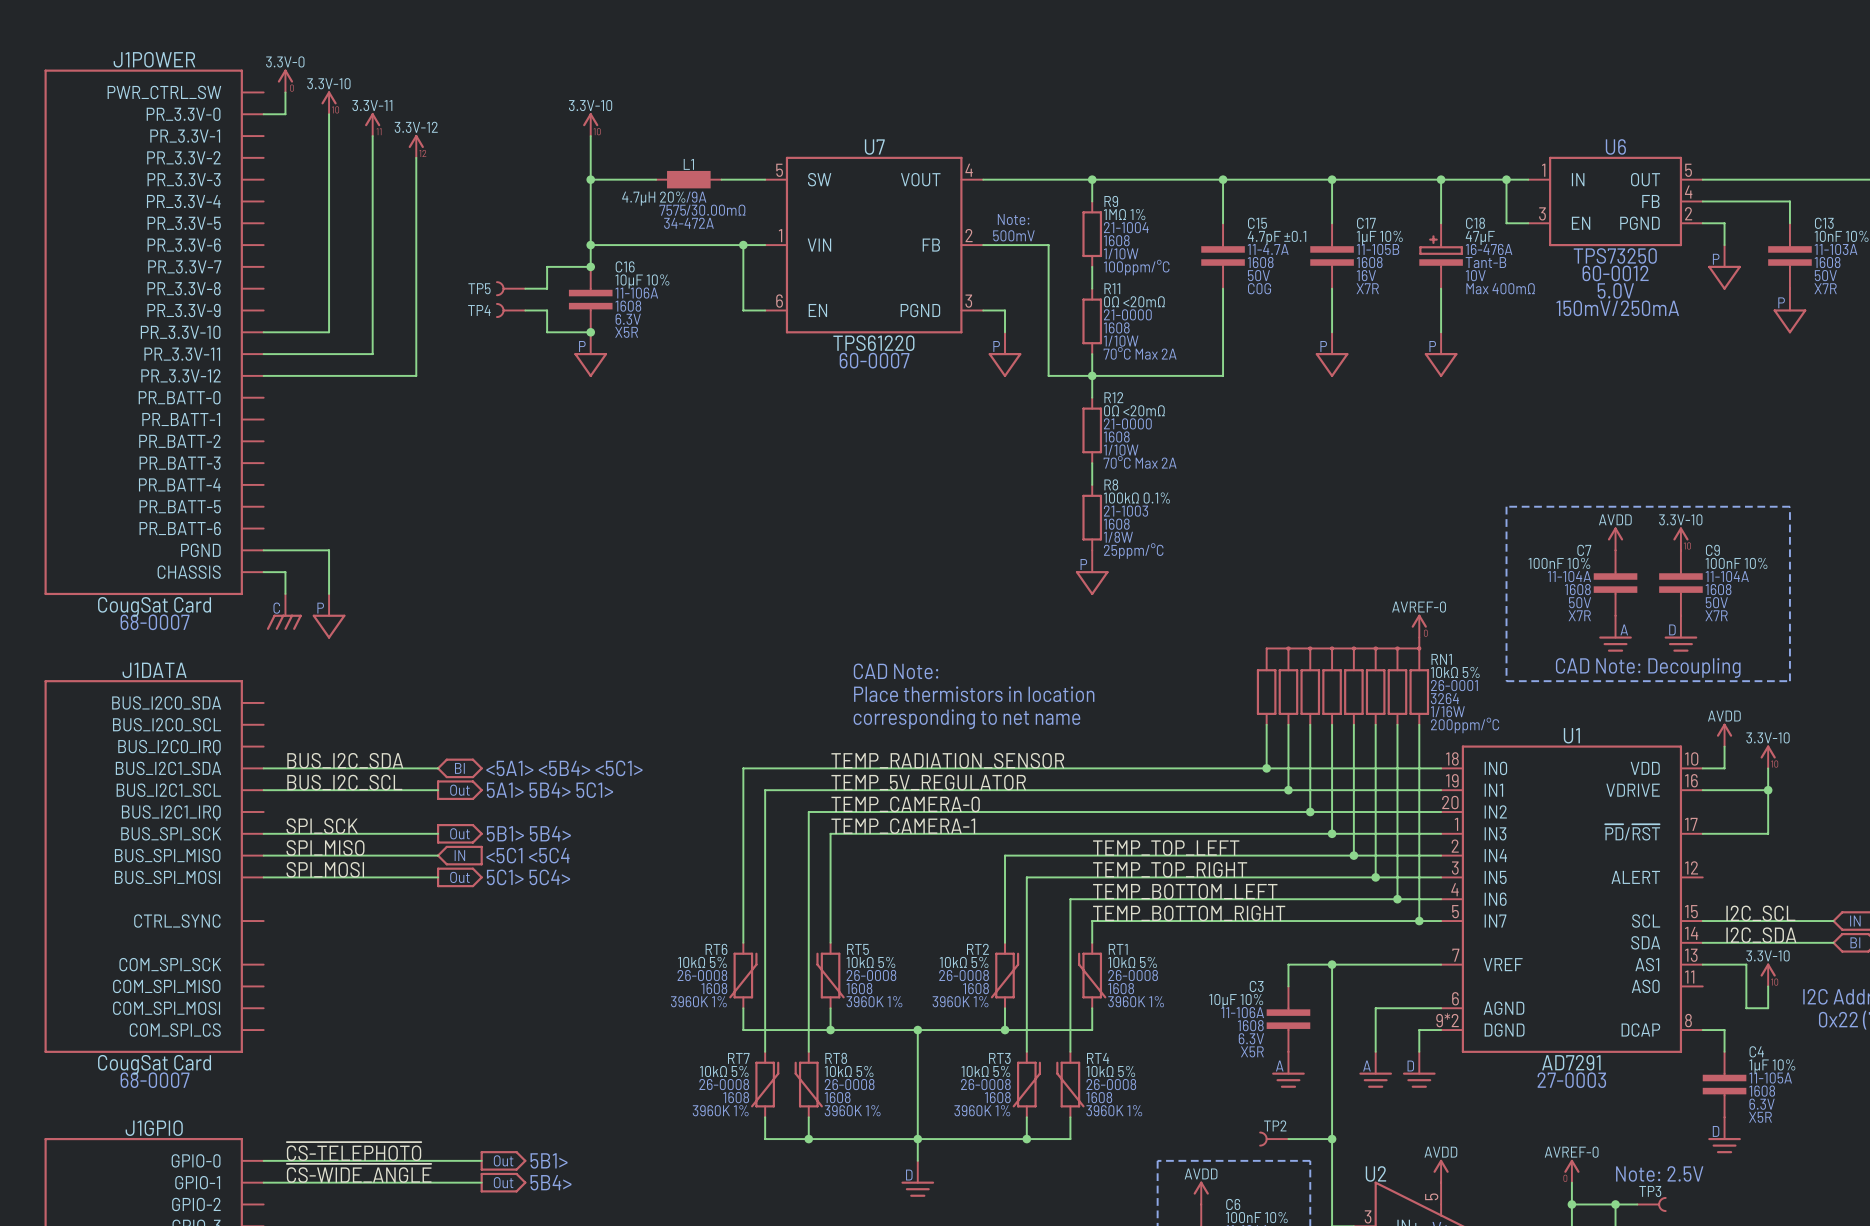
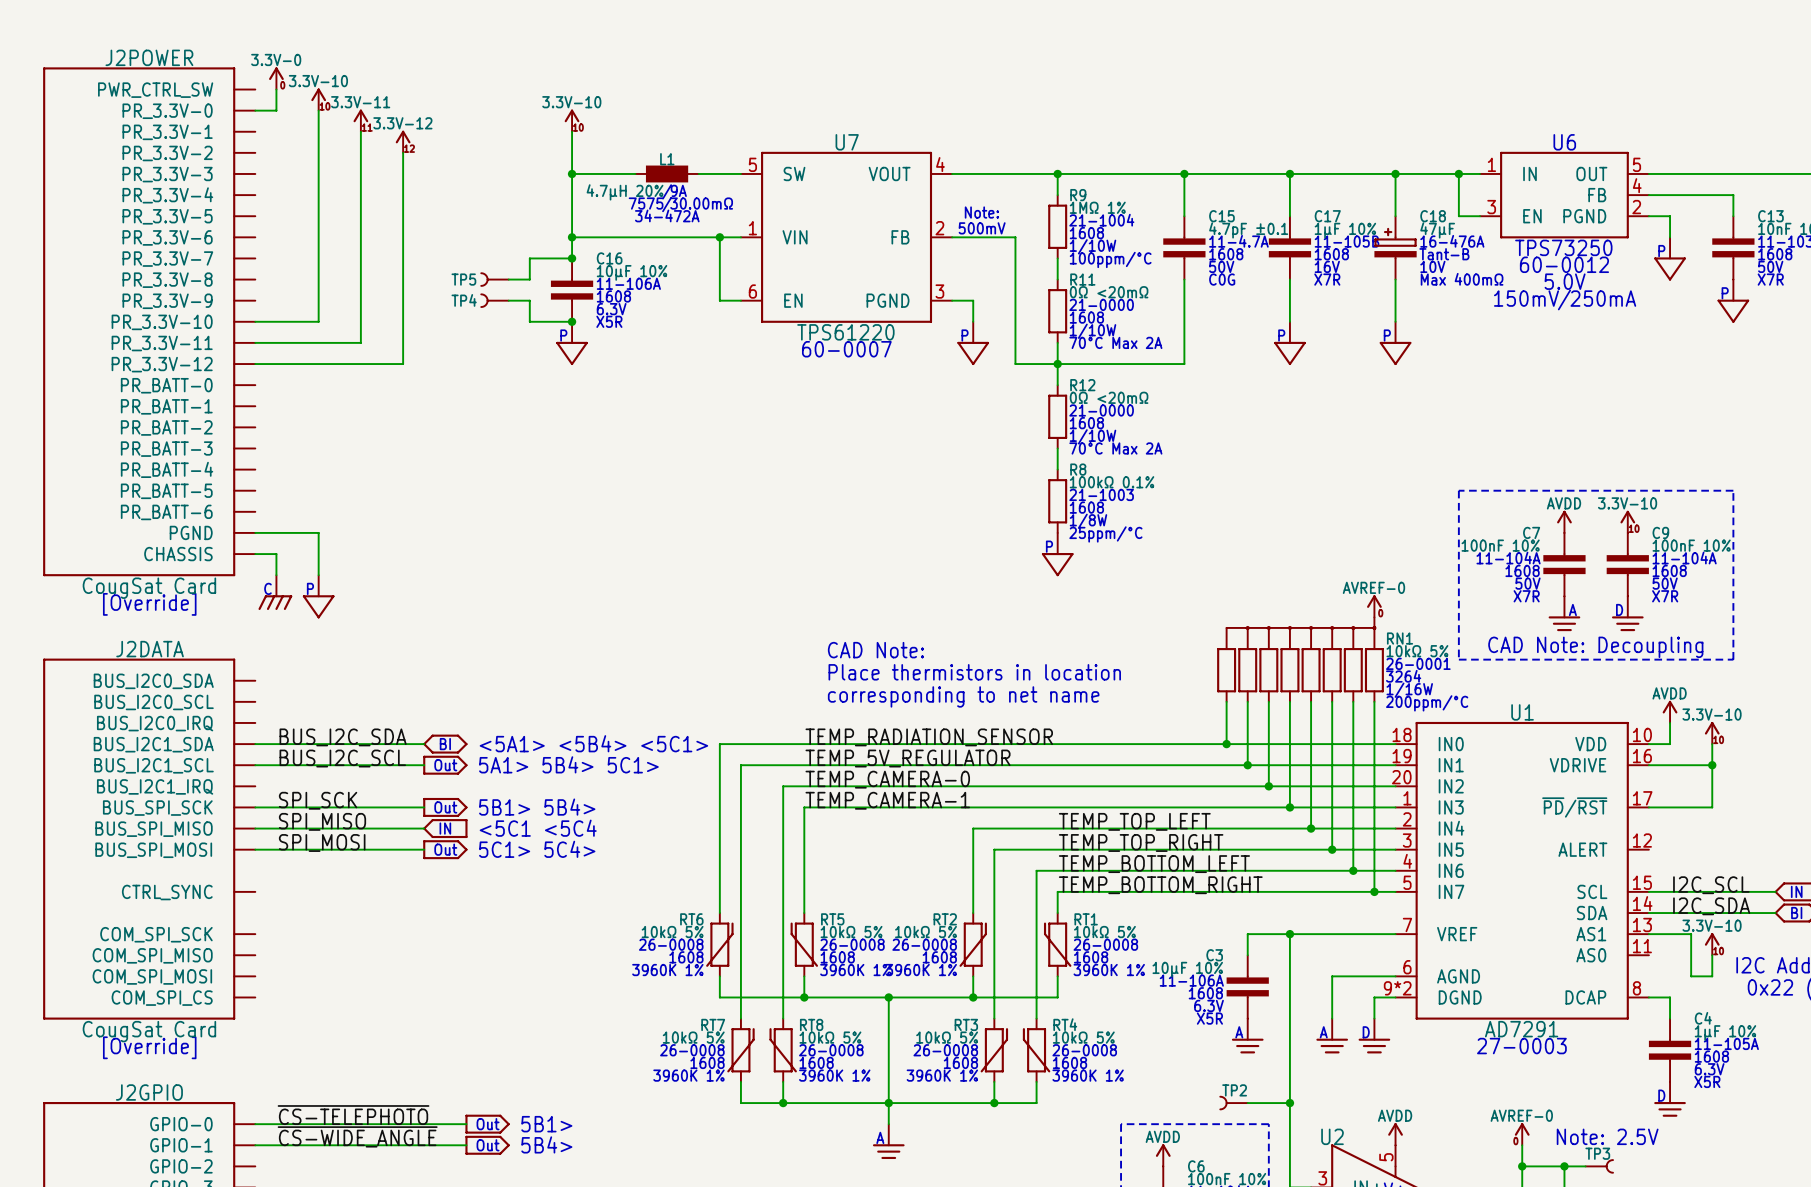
J1POWER name: J1POWER (154, 59) -> J2POWER (149, 57)
J1POWER text: 68-0007 (155, 622) -> [Override] (149, 604)
J1DATA name: J1DATA (154, 670) -> J2DATA (150, 649)
J1DATA text: 68-0007 (155, 1080) -> [Override] (149, 1047)
J1GPIO name: J1GPIO (154, 1128) -> J2GPIO (149, 1092)
power symbol text: D (909, 1175) -> A (880, 1137)

